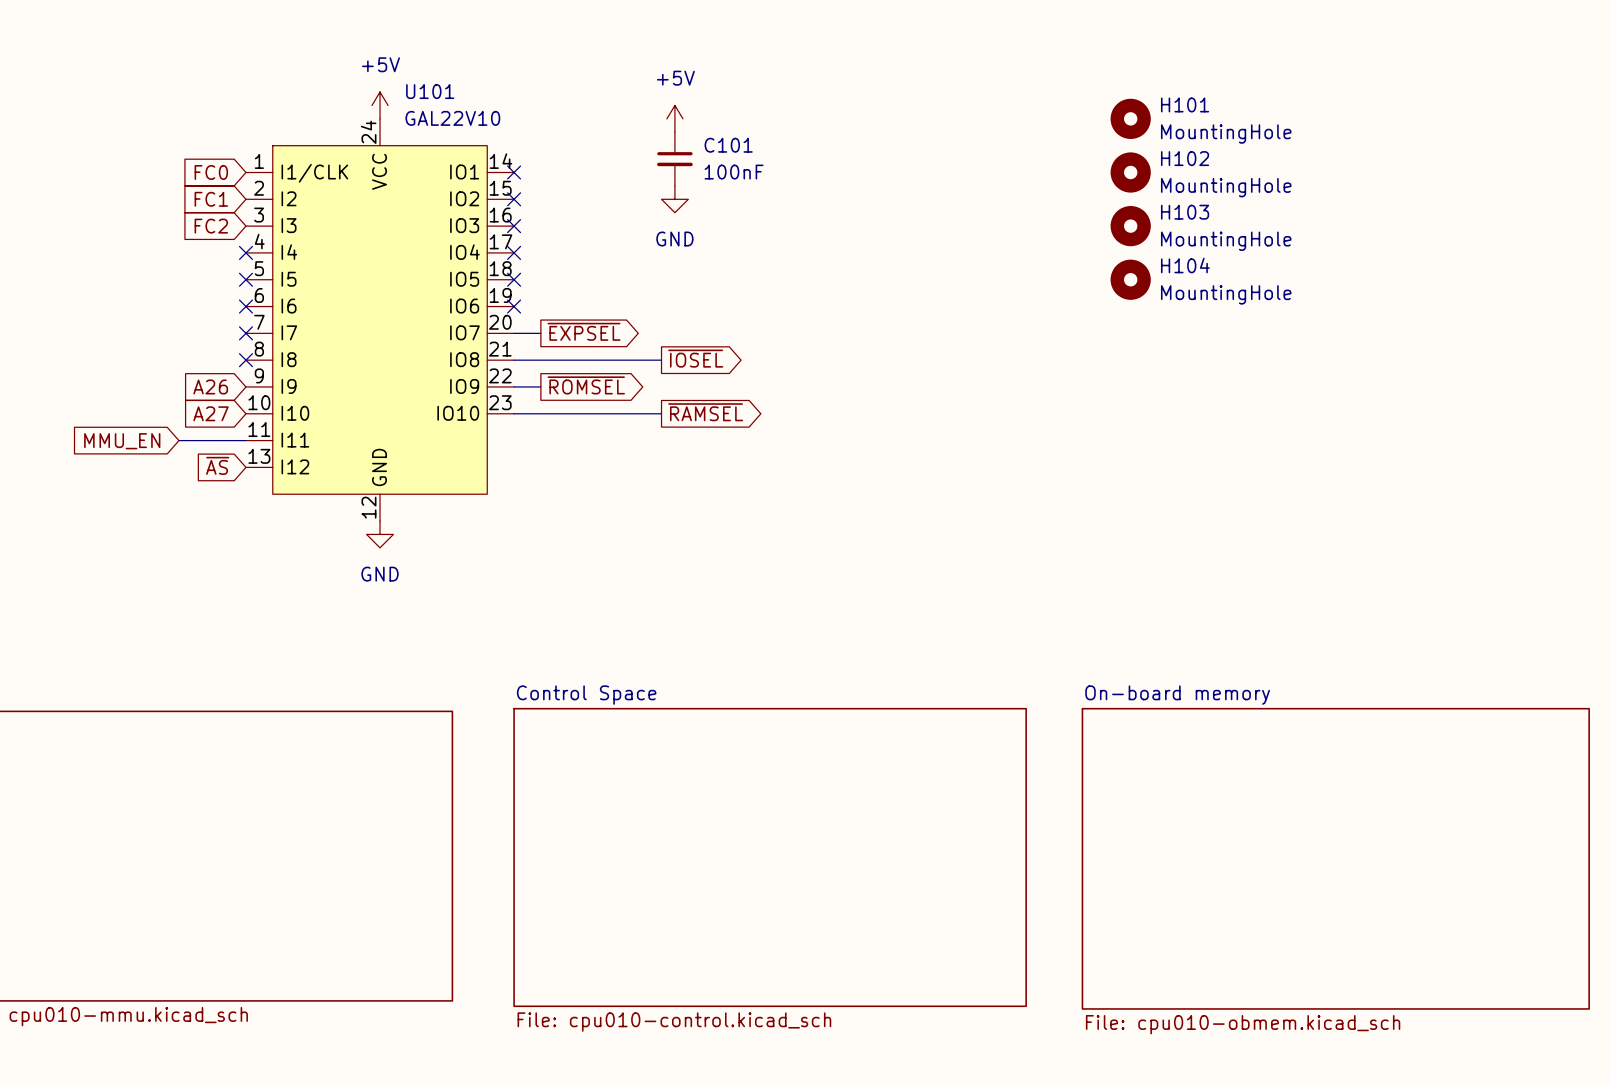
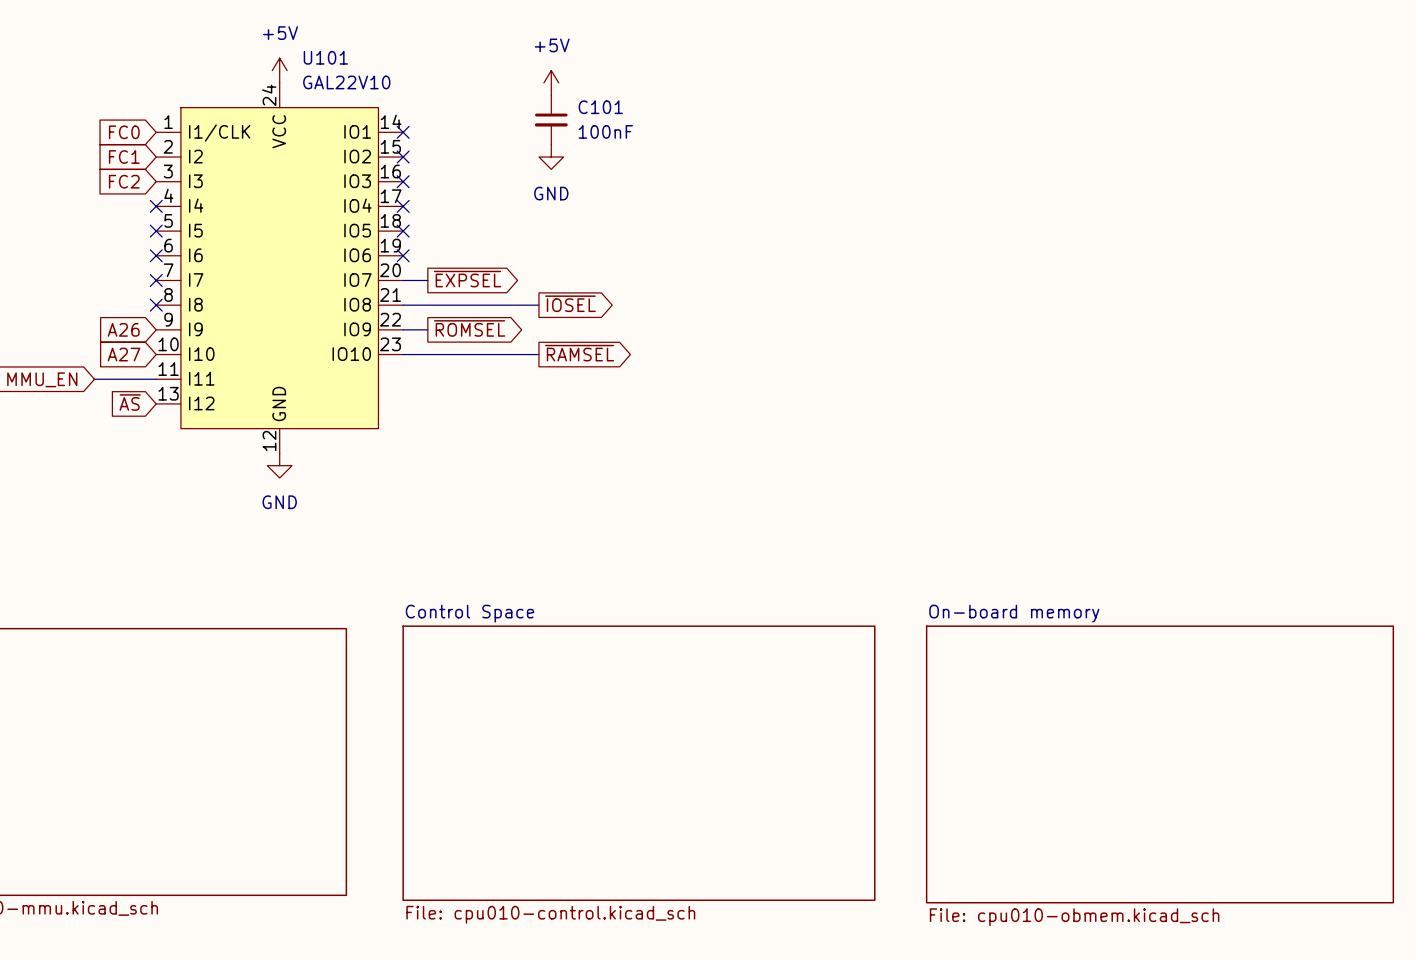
H101: MountingHole (1130, 118) -> none
H102: MountingHole (1130, 172) -> none
H103: MountingHole (1130, 226) -> none
H104: MountingHole (1130, 279) -> none

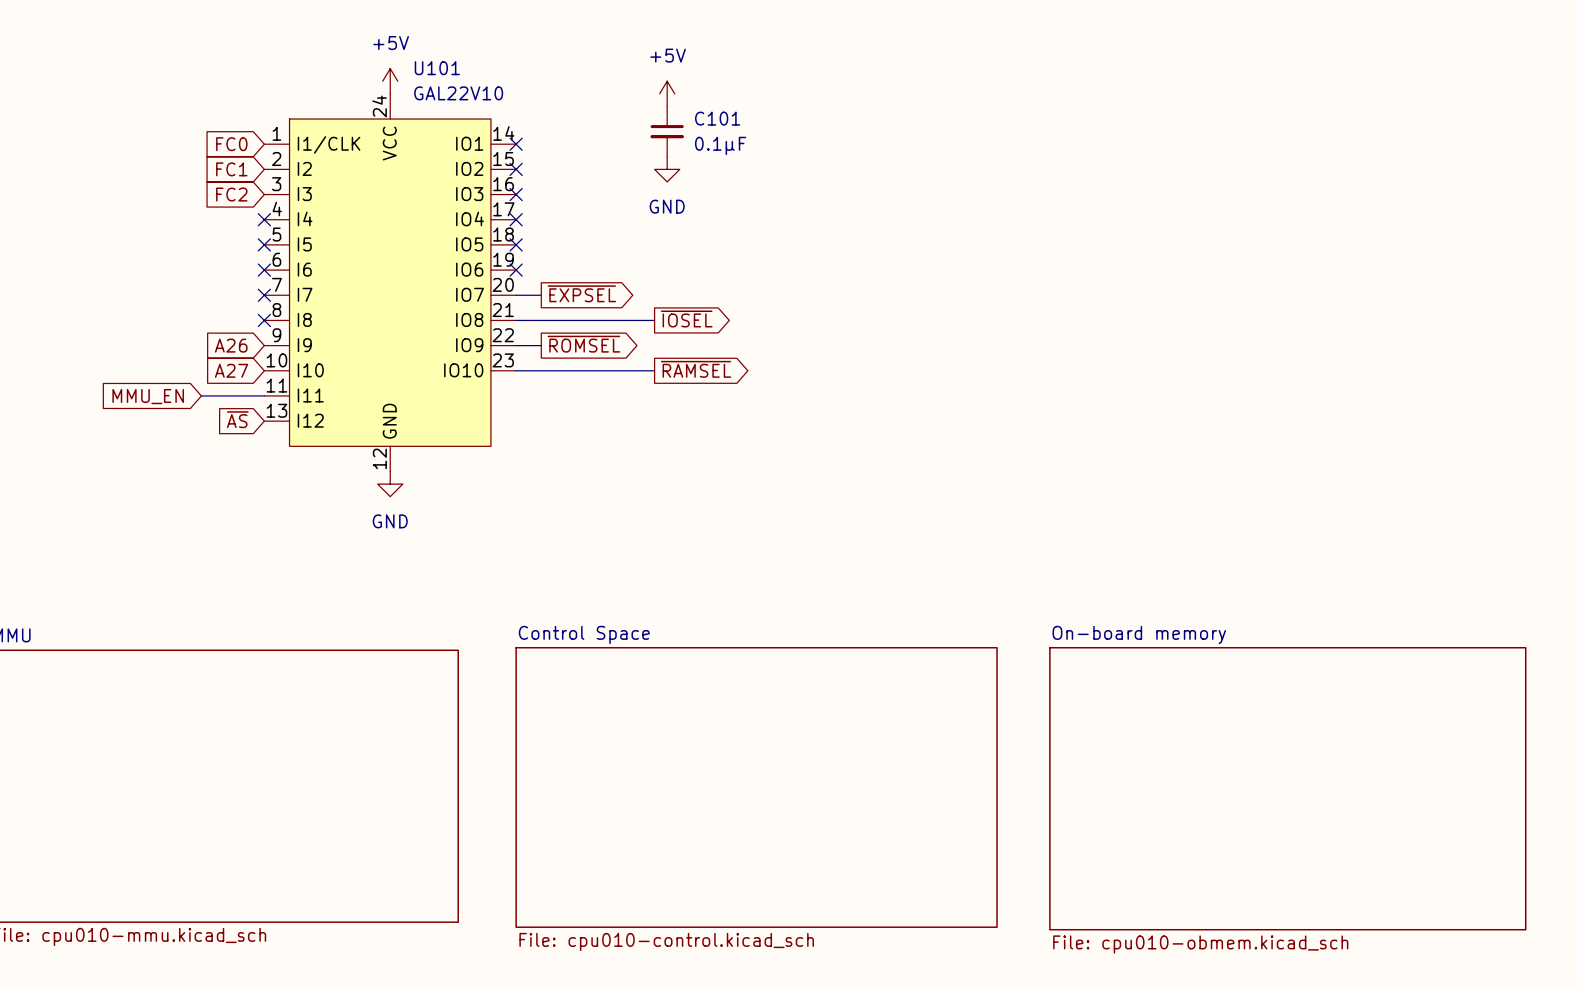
C101 value: 100nF (605, 131) -> 0.1µF (720, 145)

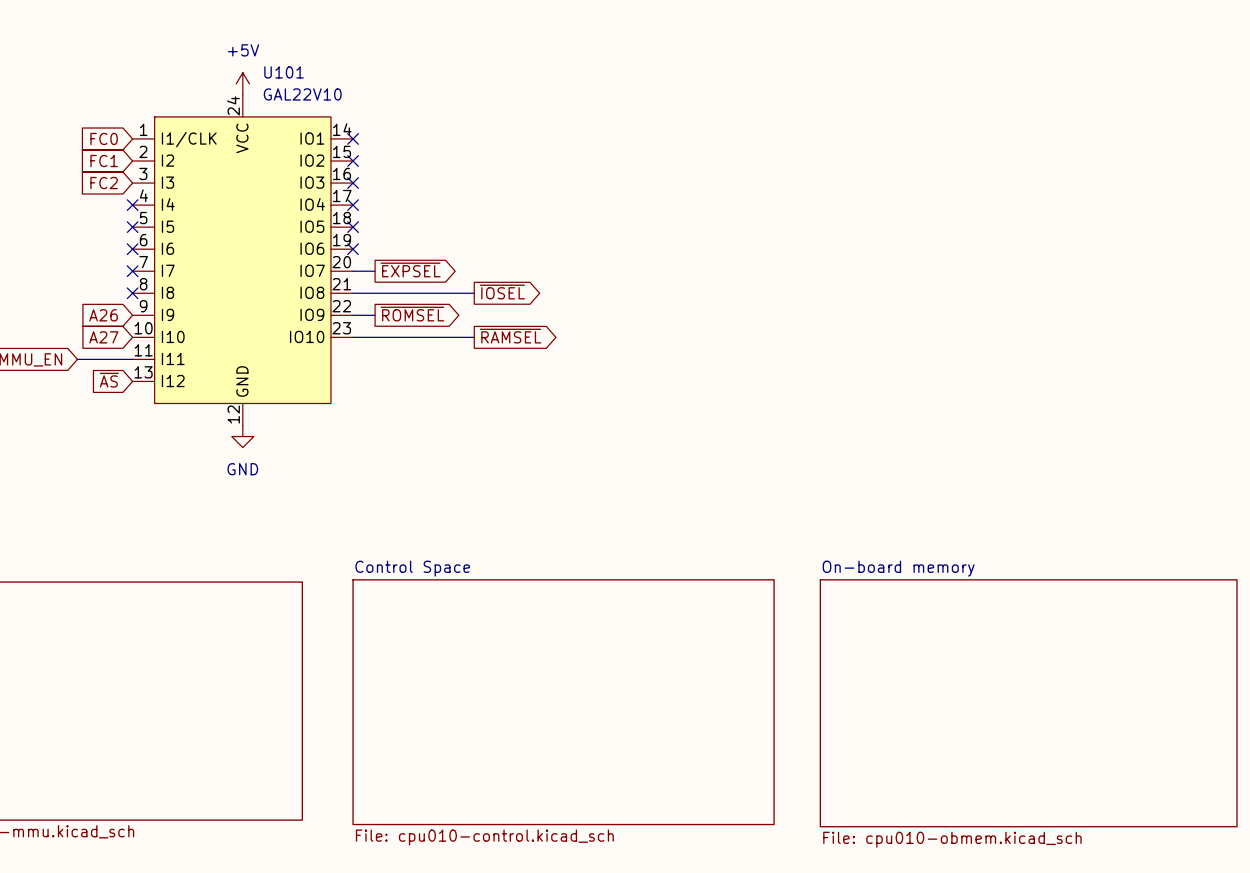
power symbol: +5V (667, 93) -> none
C101: 0.1µF (667, 131) -> none
power symbol: GND (667, 169) -> none

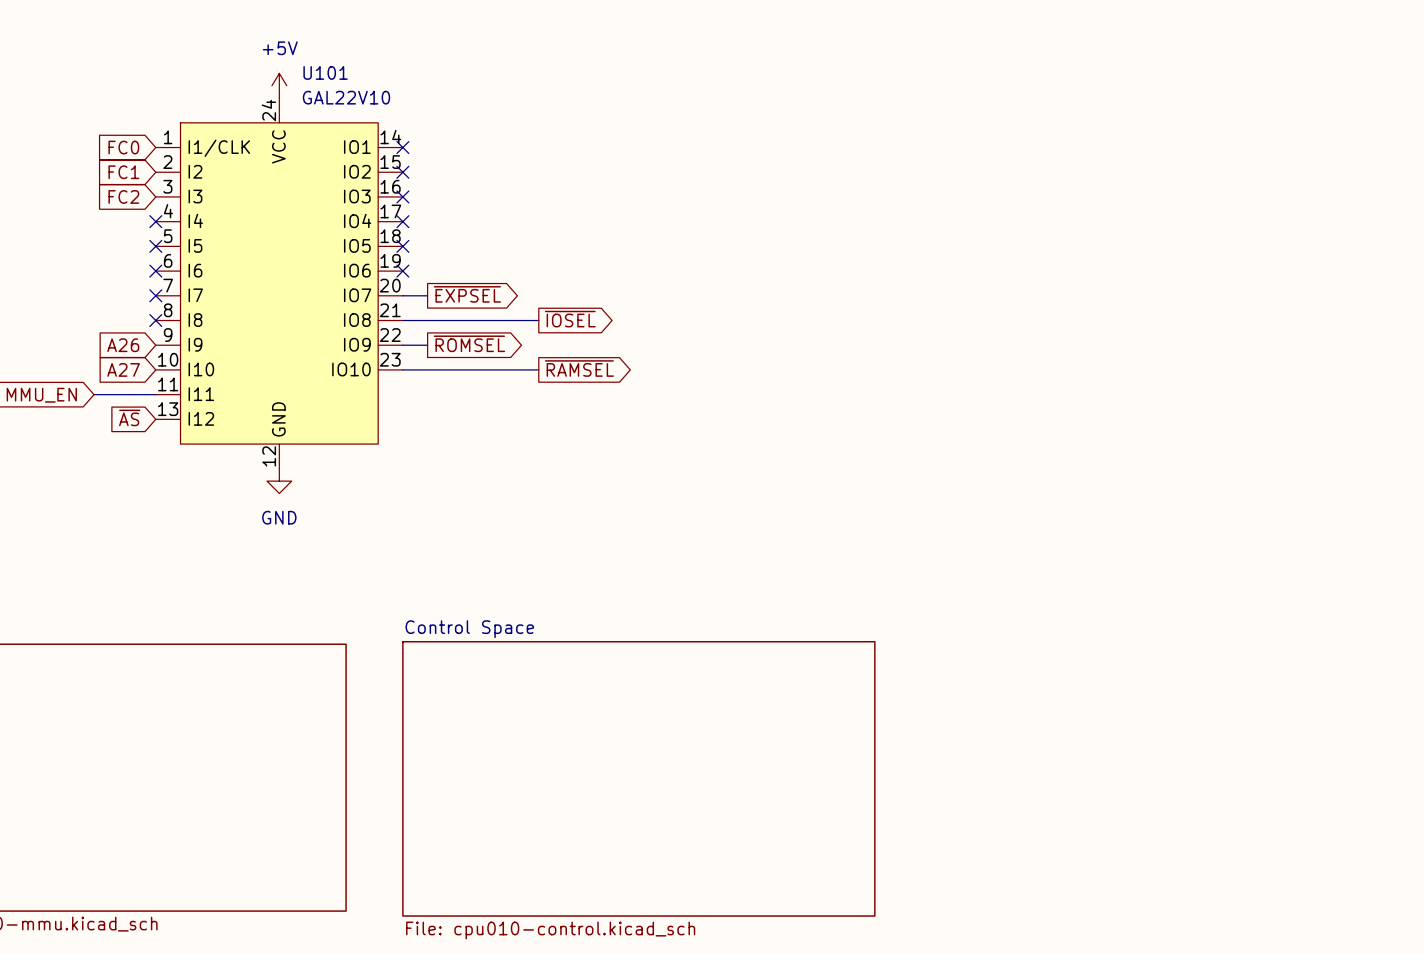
sheet On-board memory: File: cpu010-obmem.kicad_sch (1028, 703) -> none

